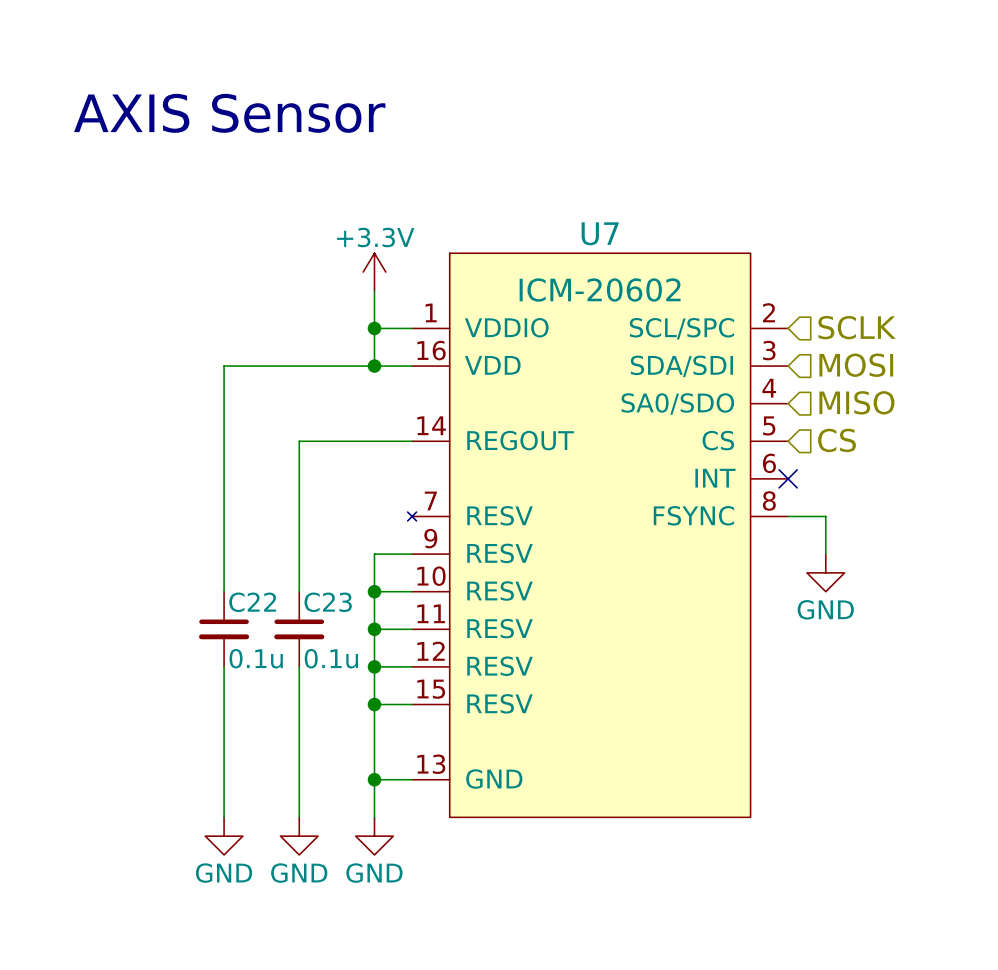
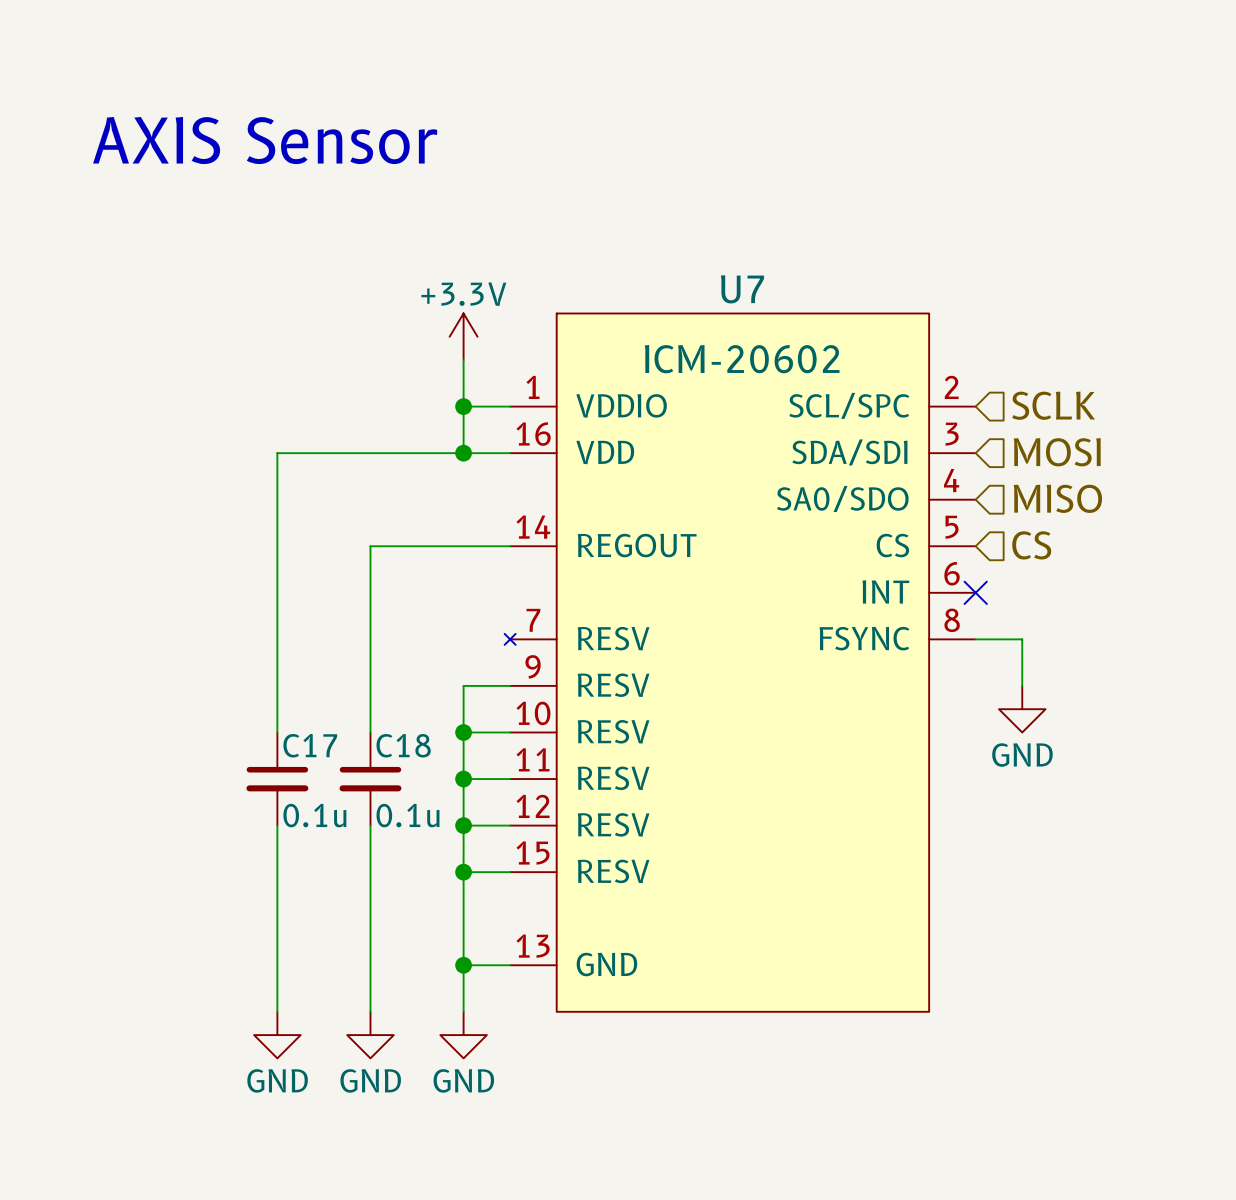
C22 name: C22 (252, 602) -> C17 (310, 745)
C23 name: C23 (328, 602) -> C18 (403, 745)

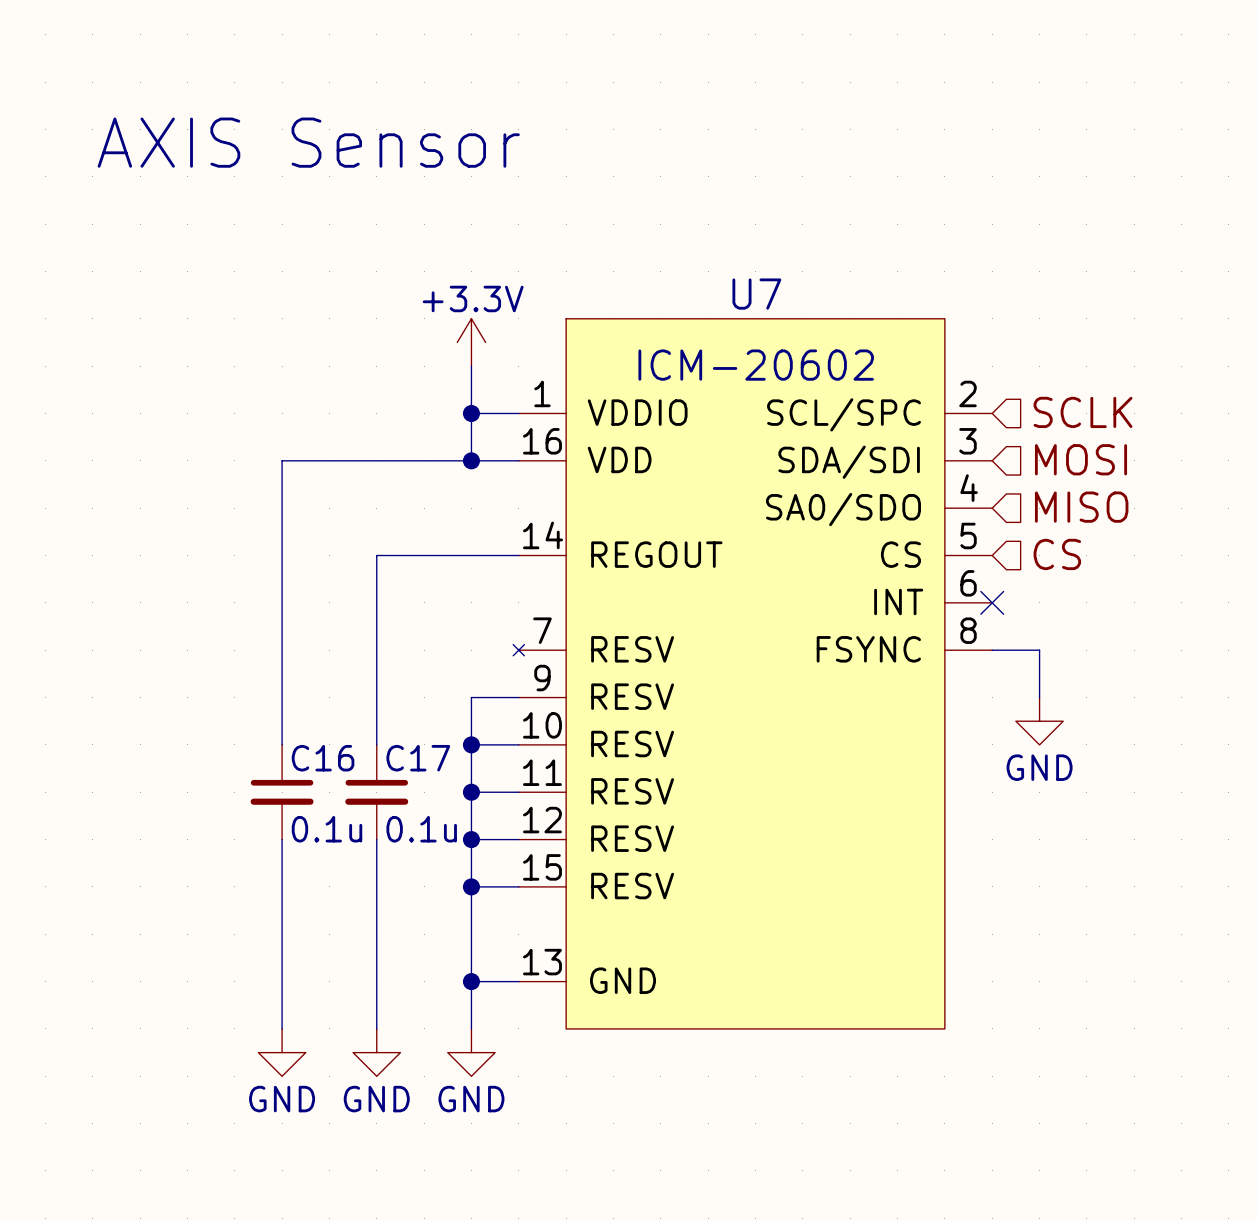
C17 name: C17 (310, 745) -> C16 (323, 758)
C18 name: C18 (403, 745) -> C17 (418, 758)

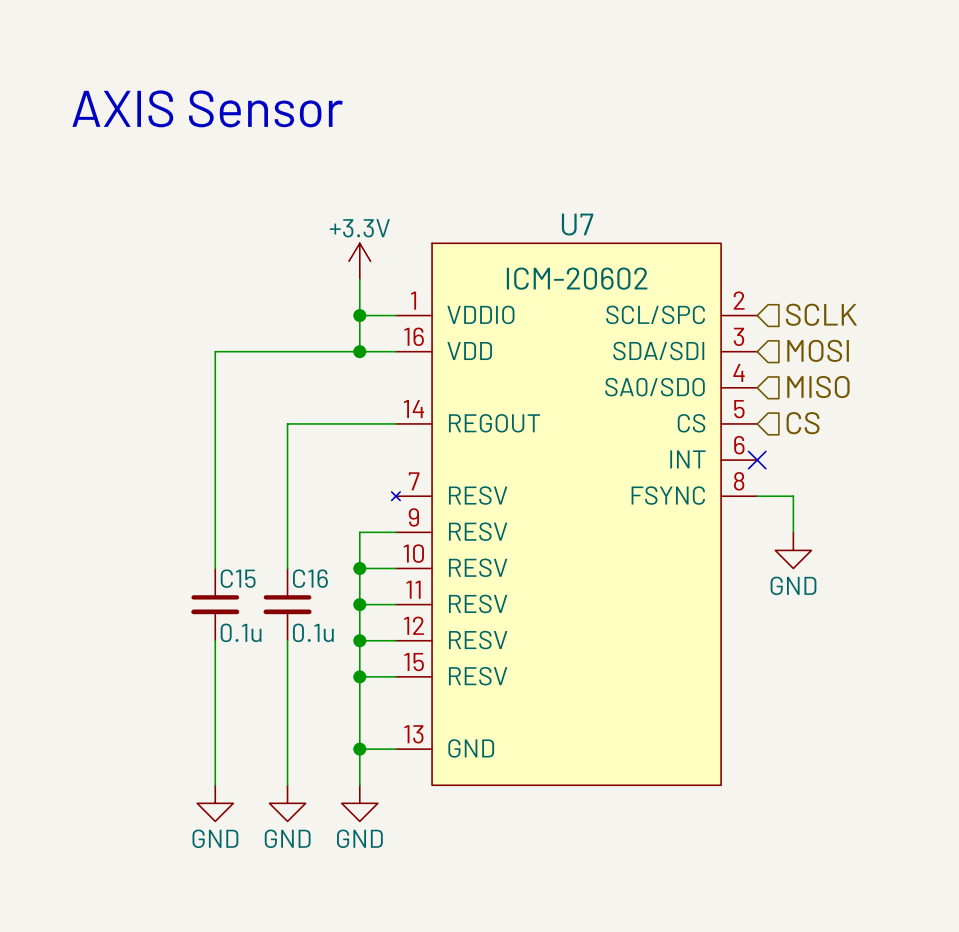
C16 name: C16 (323, 758) -> C15 (238, 578)
C17 name: C17 (418, 758) -> C16 (310, 578)

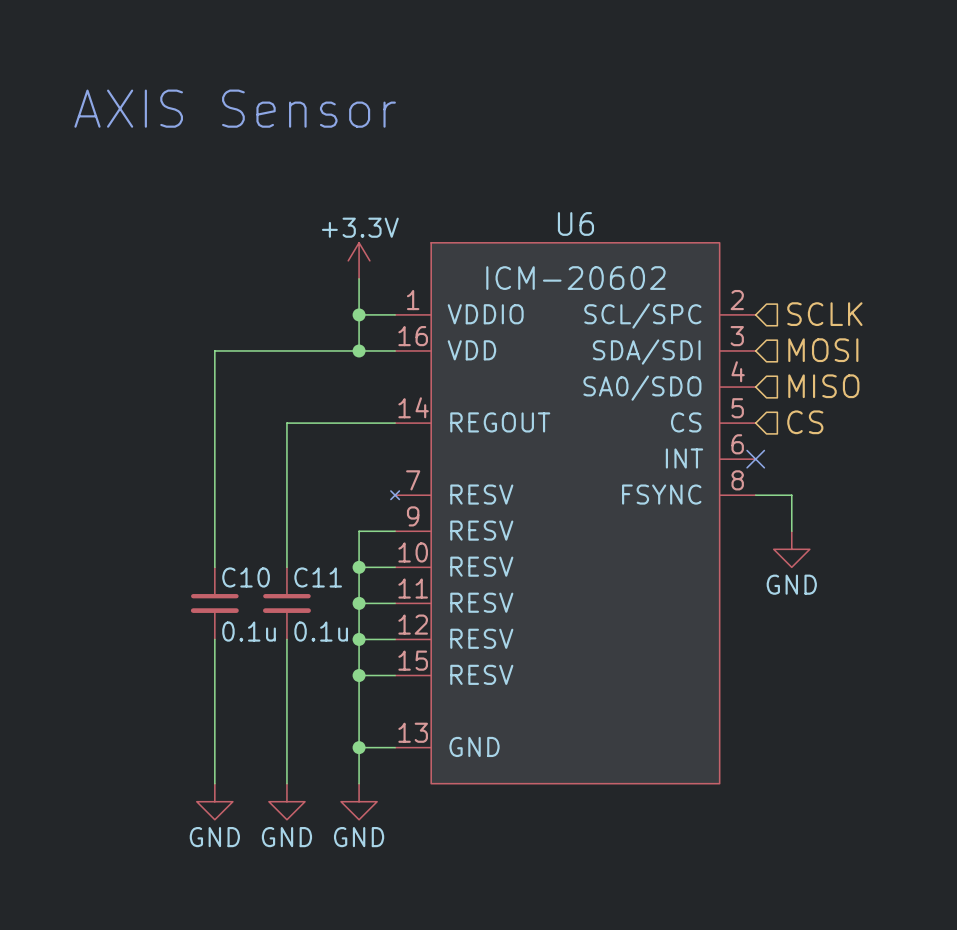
U7 name: U7 (577, 224) -> U6 (575, 223)
C15 name: C15 (238, 578) -> C10 (246, 577)
C16 name: C16 (310, 578) -> C11 (318, 577)

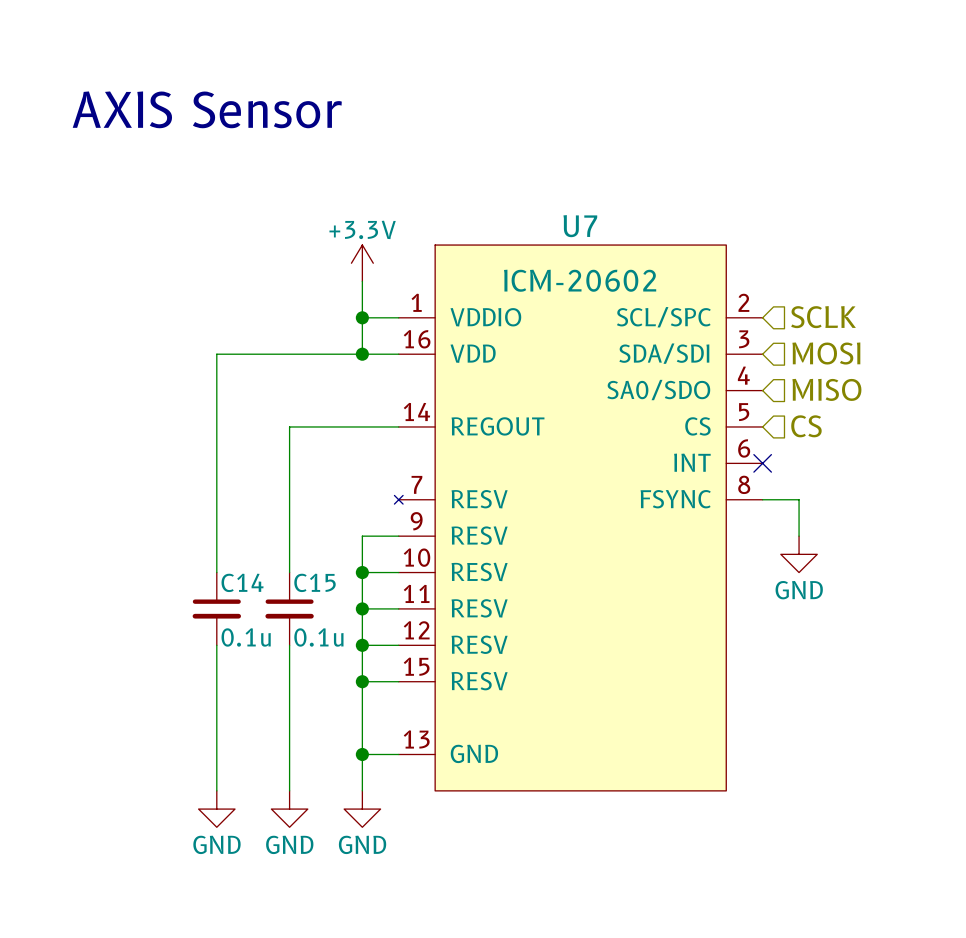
U6 name: U6 (575, 223) -> U7 (580, 226)
C10 name: C10 (246, 577) -> C14 (242, 582)
C11 name: C11 (318, 577) -> C15 (315, 582)

